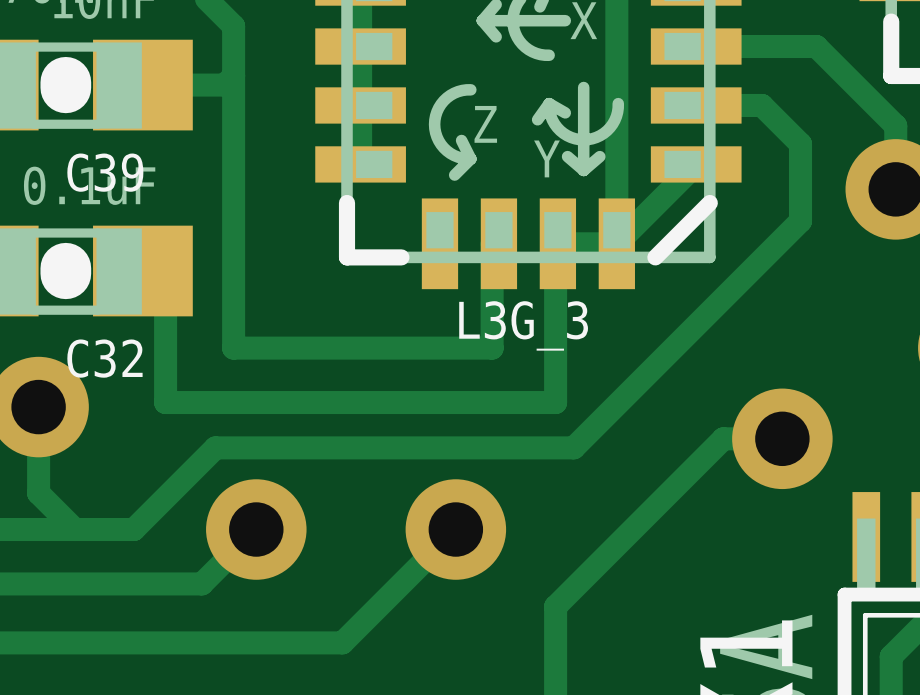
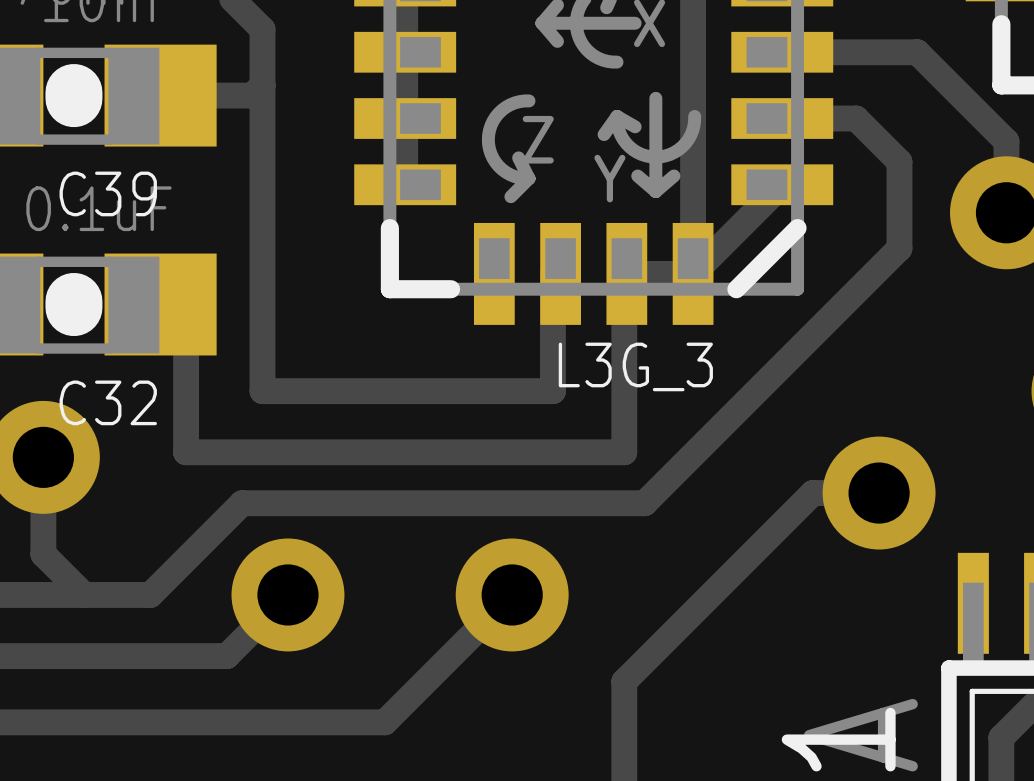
L3G_3 name position: L3G_3 (523, 325) -> L3G_3 (635, 366)

